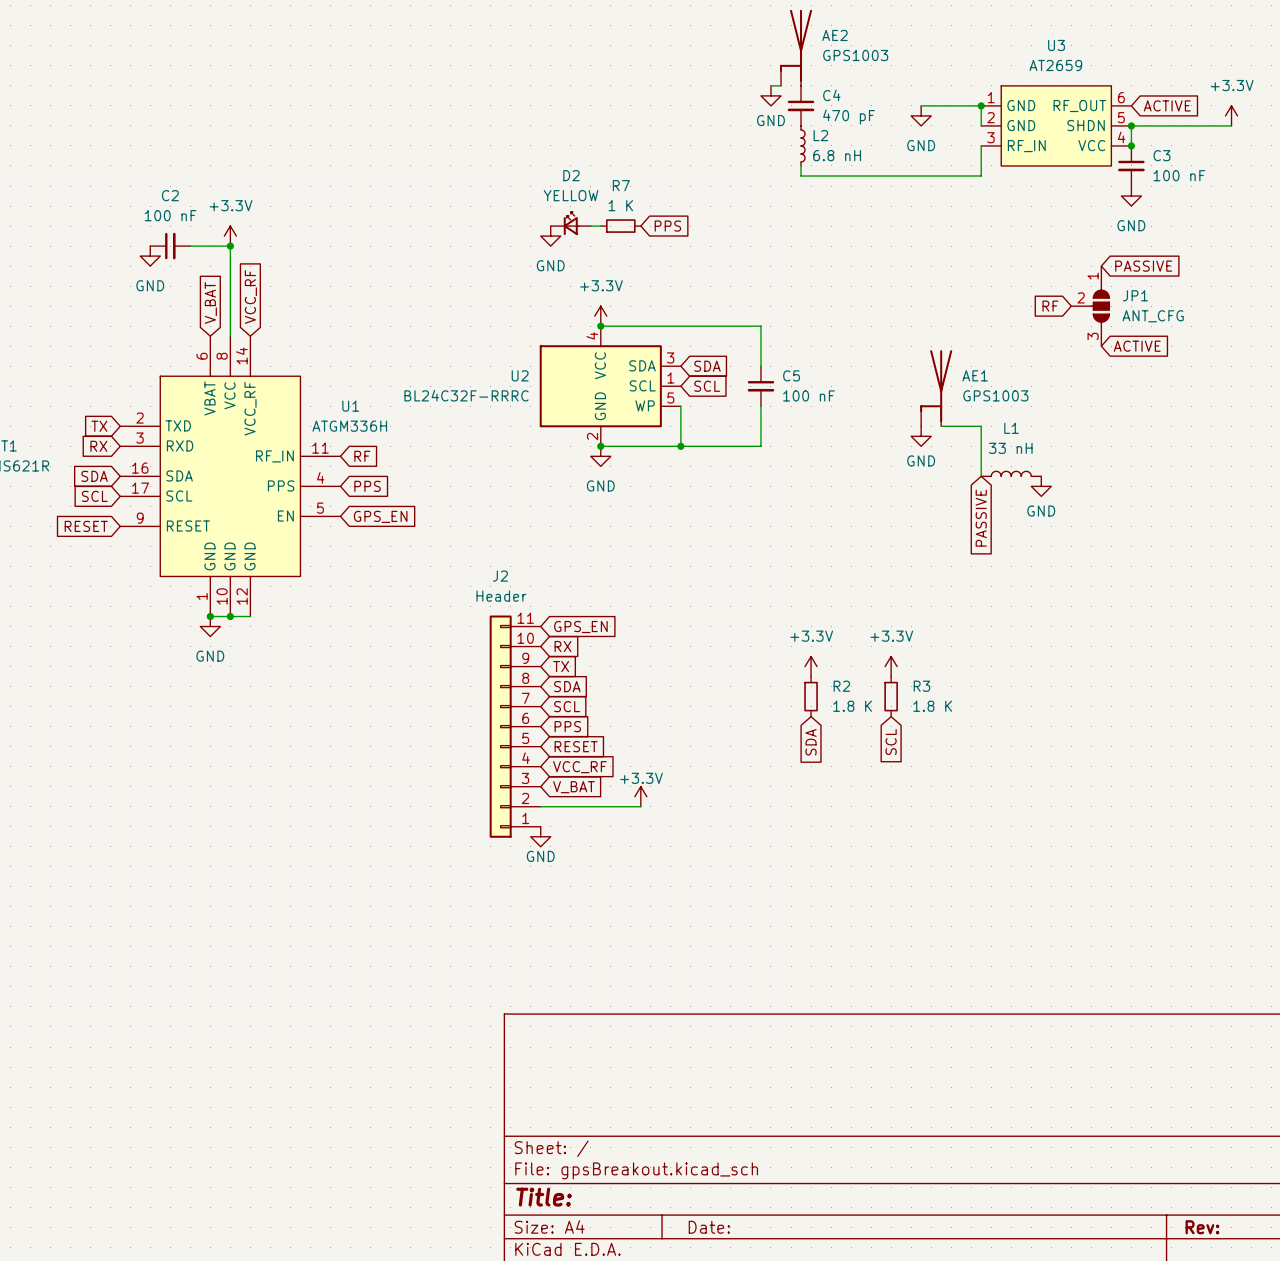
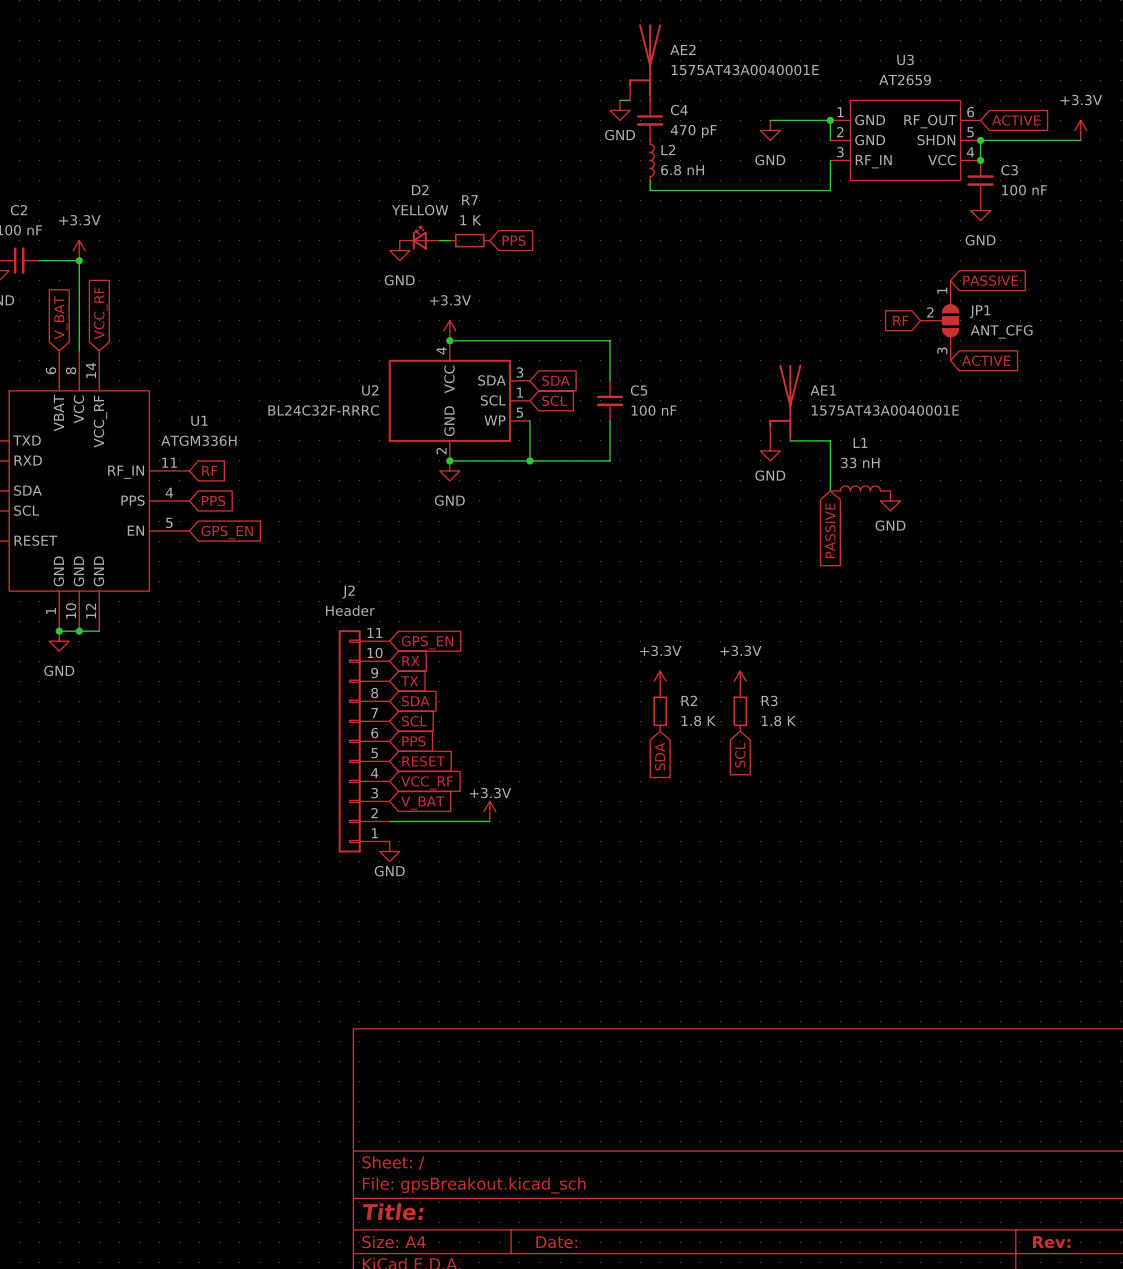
AE2 value: GPS1003 (855, 55) -> 1575AT43A0040001E (745, 70)
AE1 value: GPS1003 (995, 395) -> 1575AT43A0040001E (885, 410)

